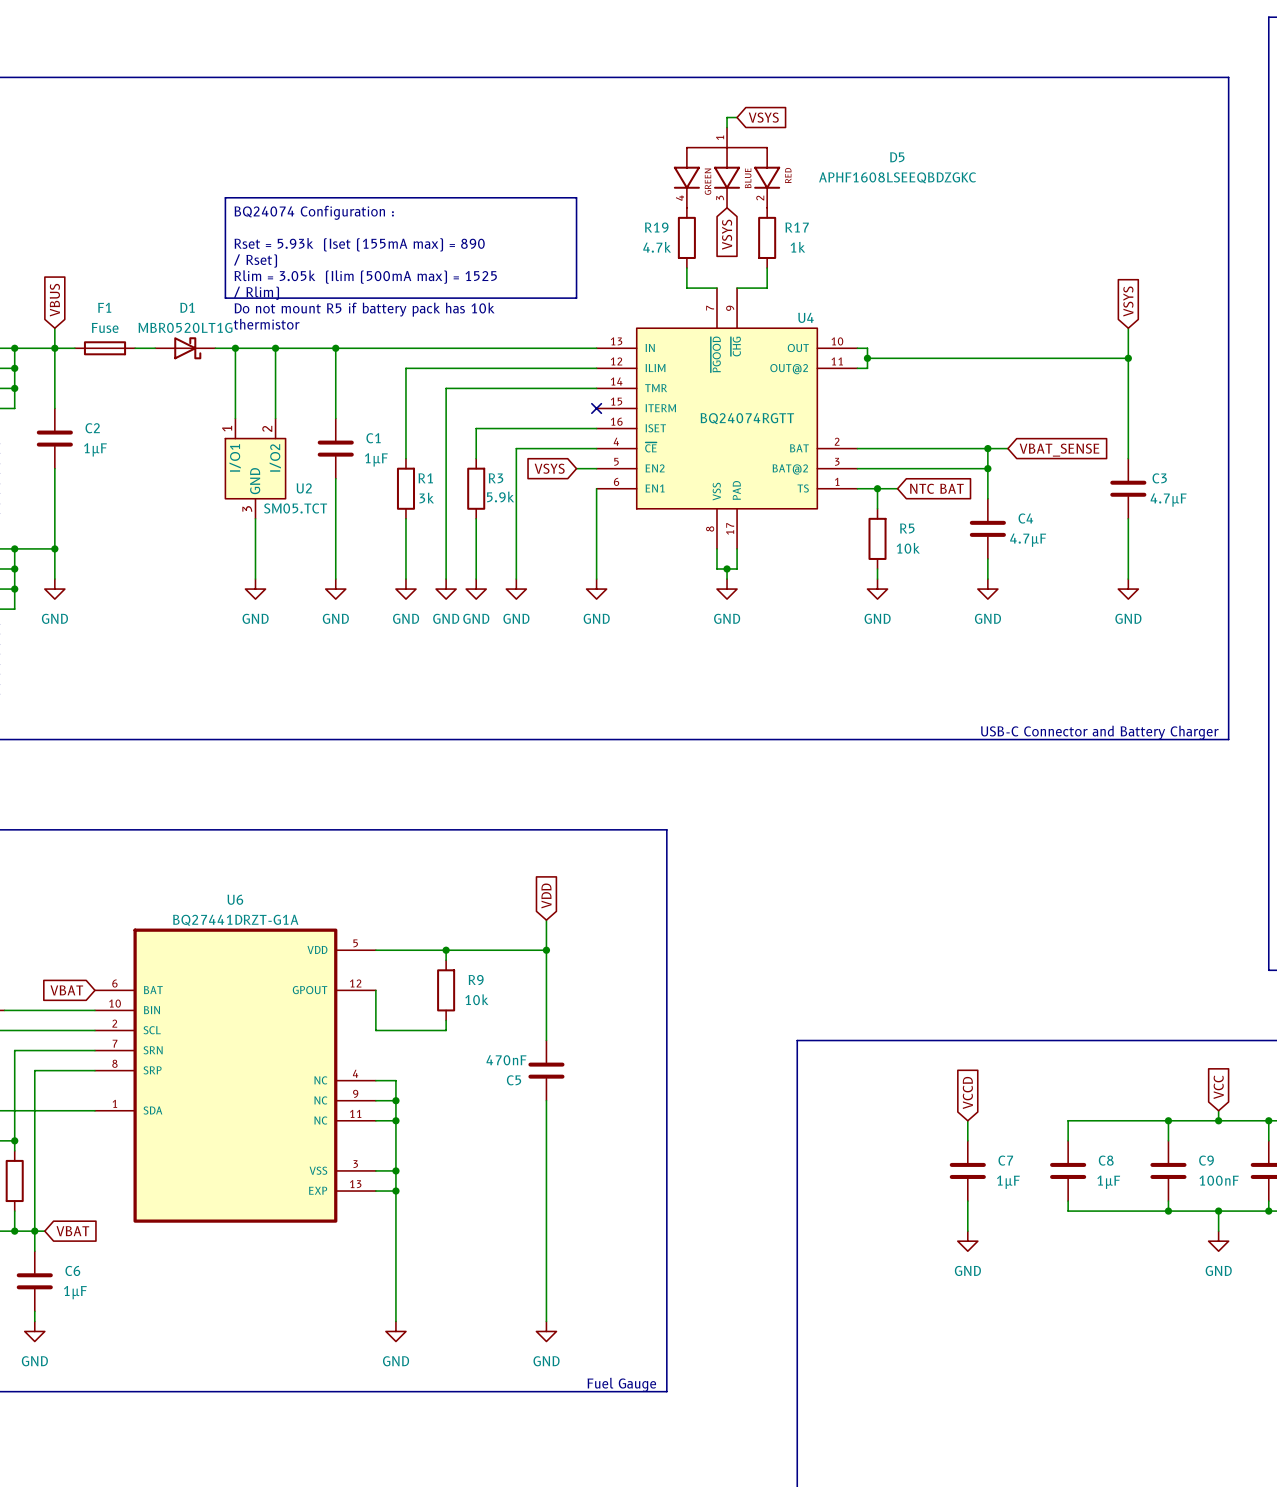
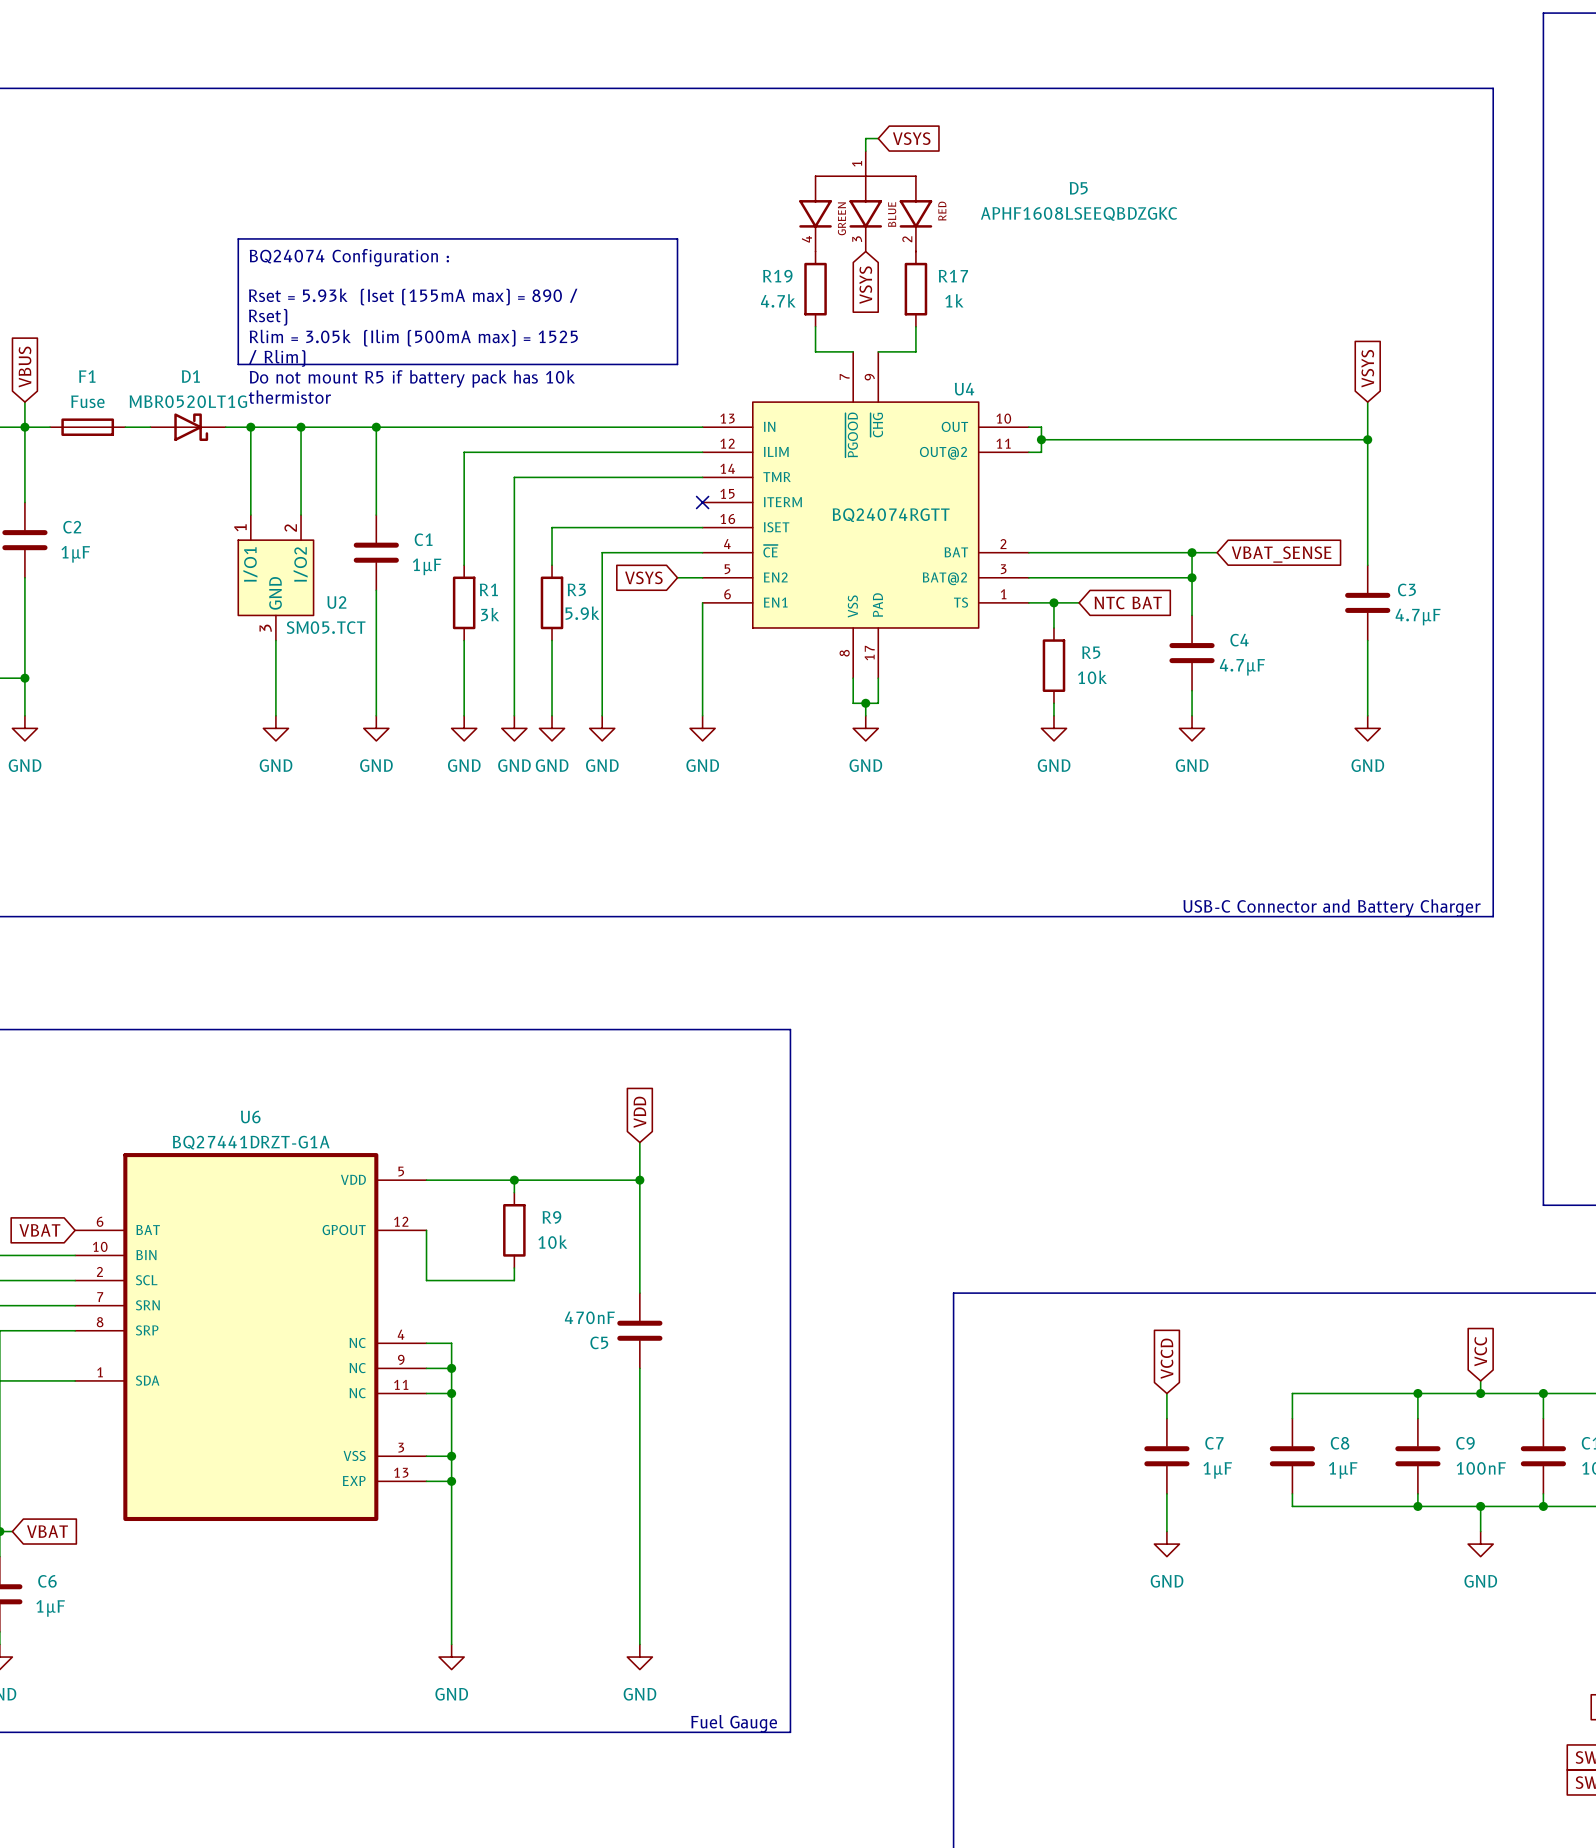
text: Rset = 5.93k (Iset (155mA max) = 890 (359, 244) -> Rset = 5.93k (Iset (155mA max) = 890 / (413, 296)
text: / Rset) (255, 260) -> Rset) (268, 317)

